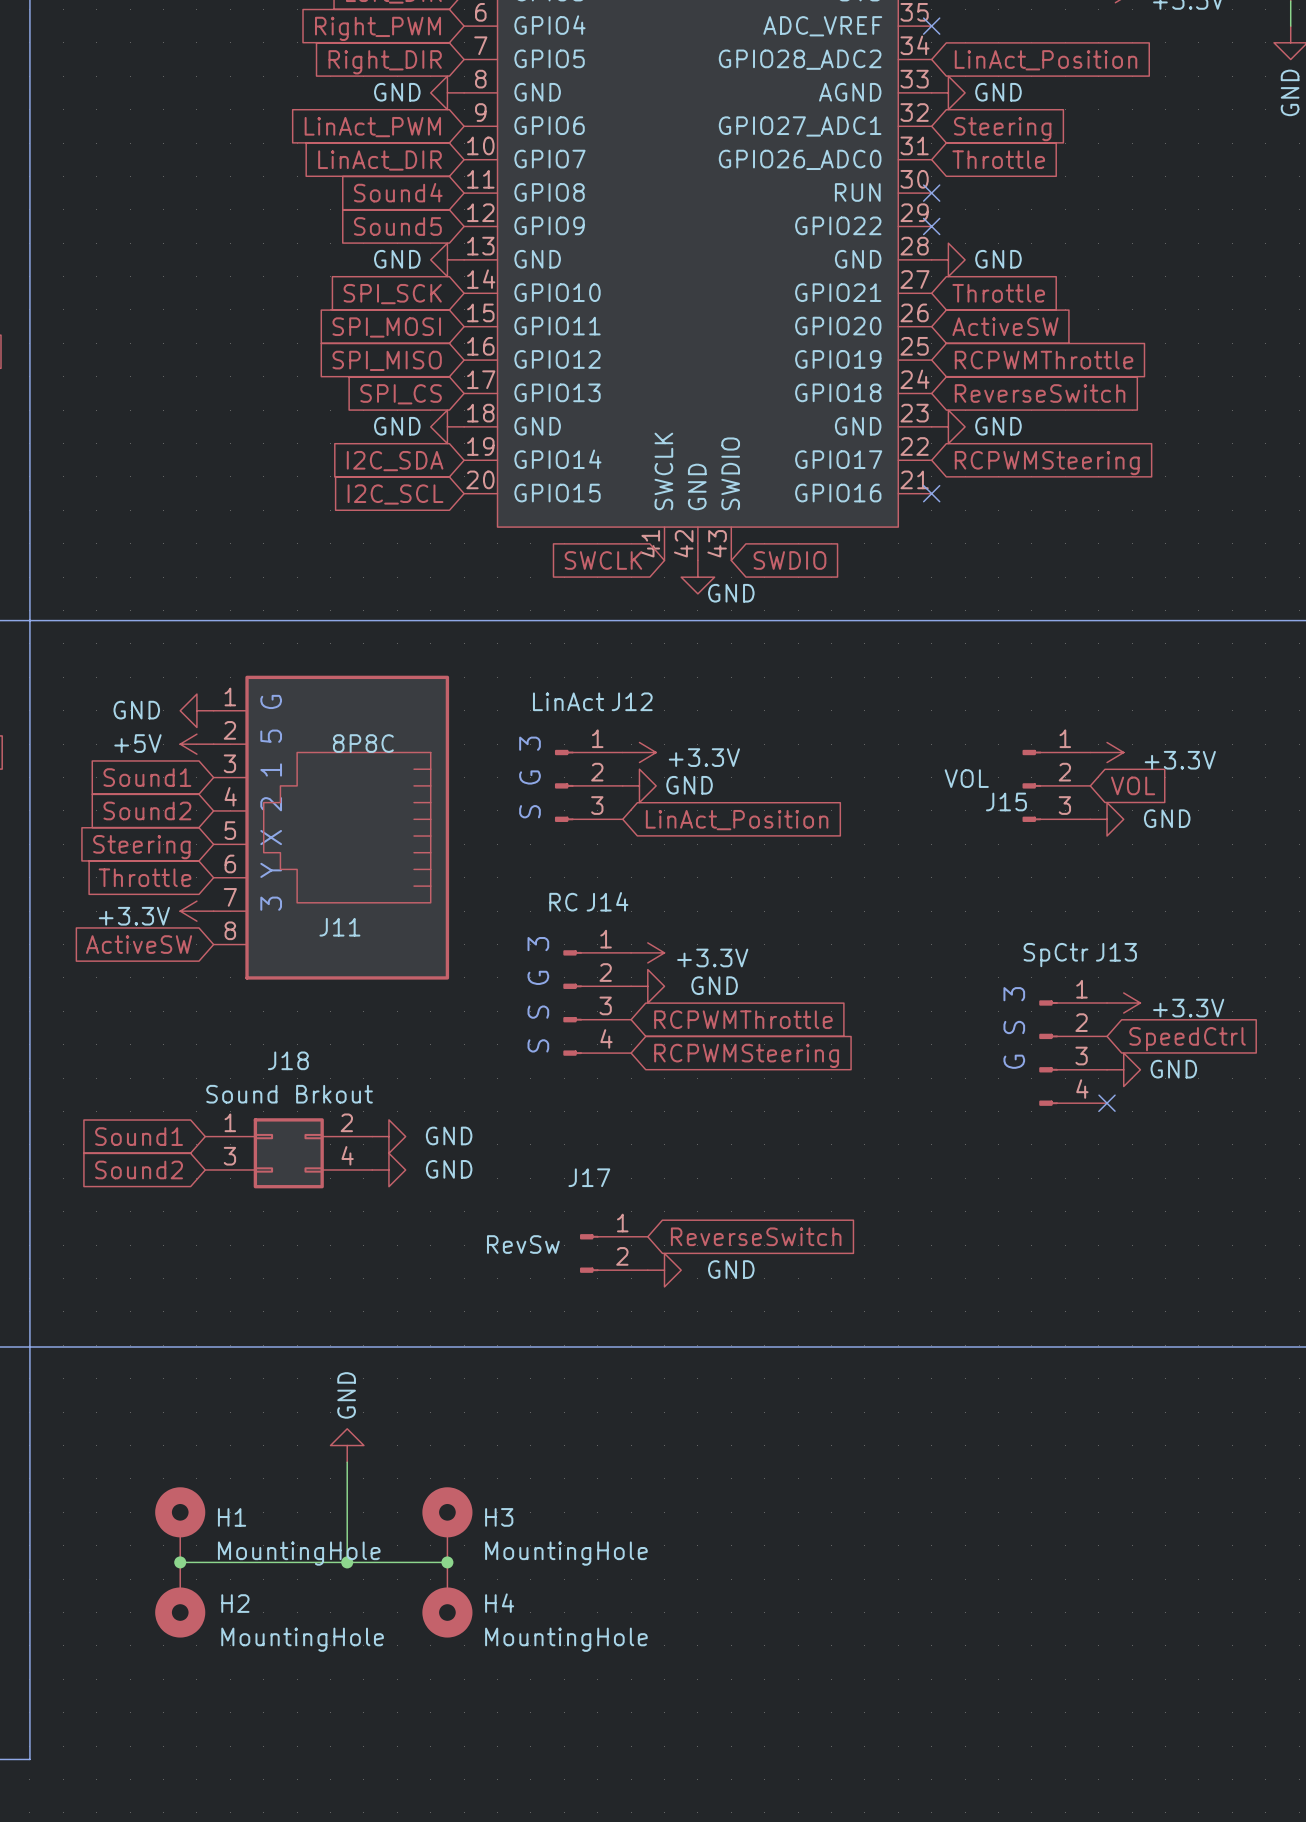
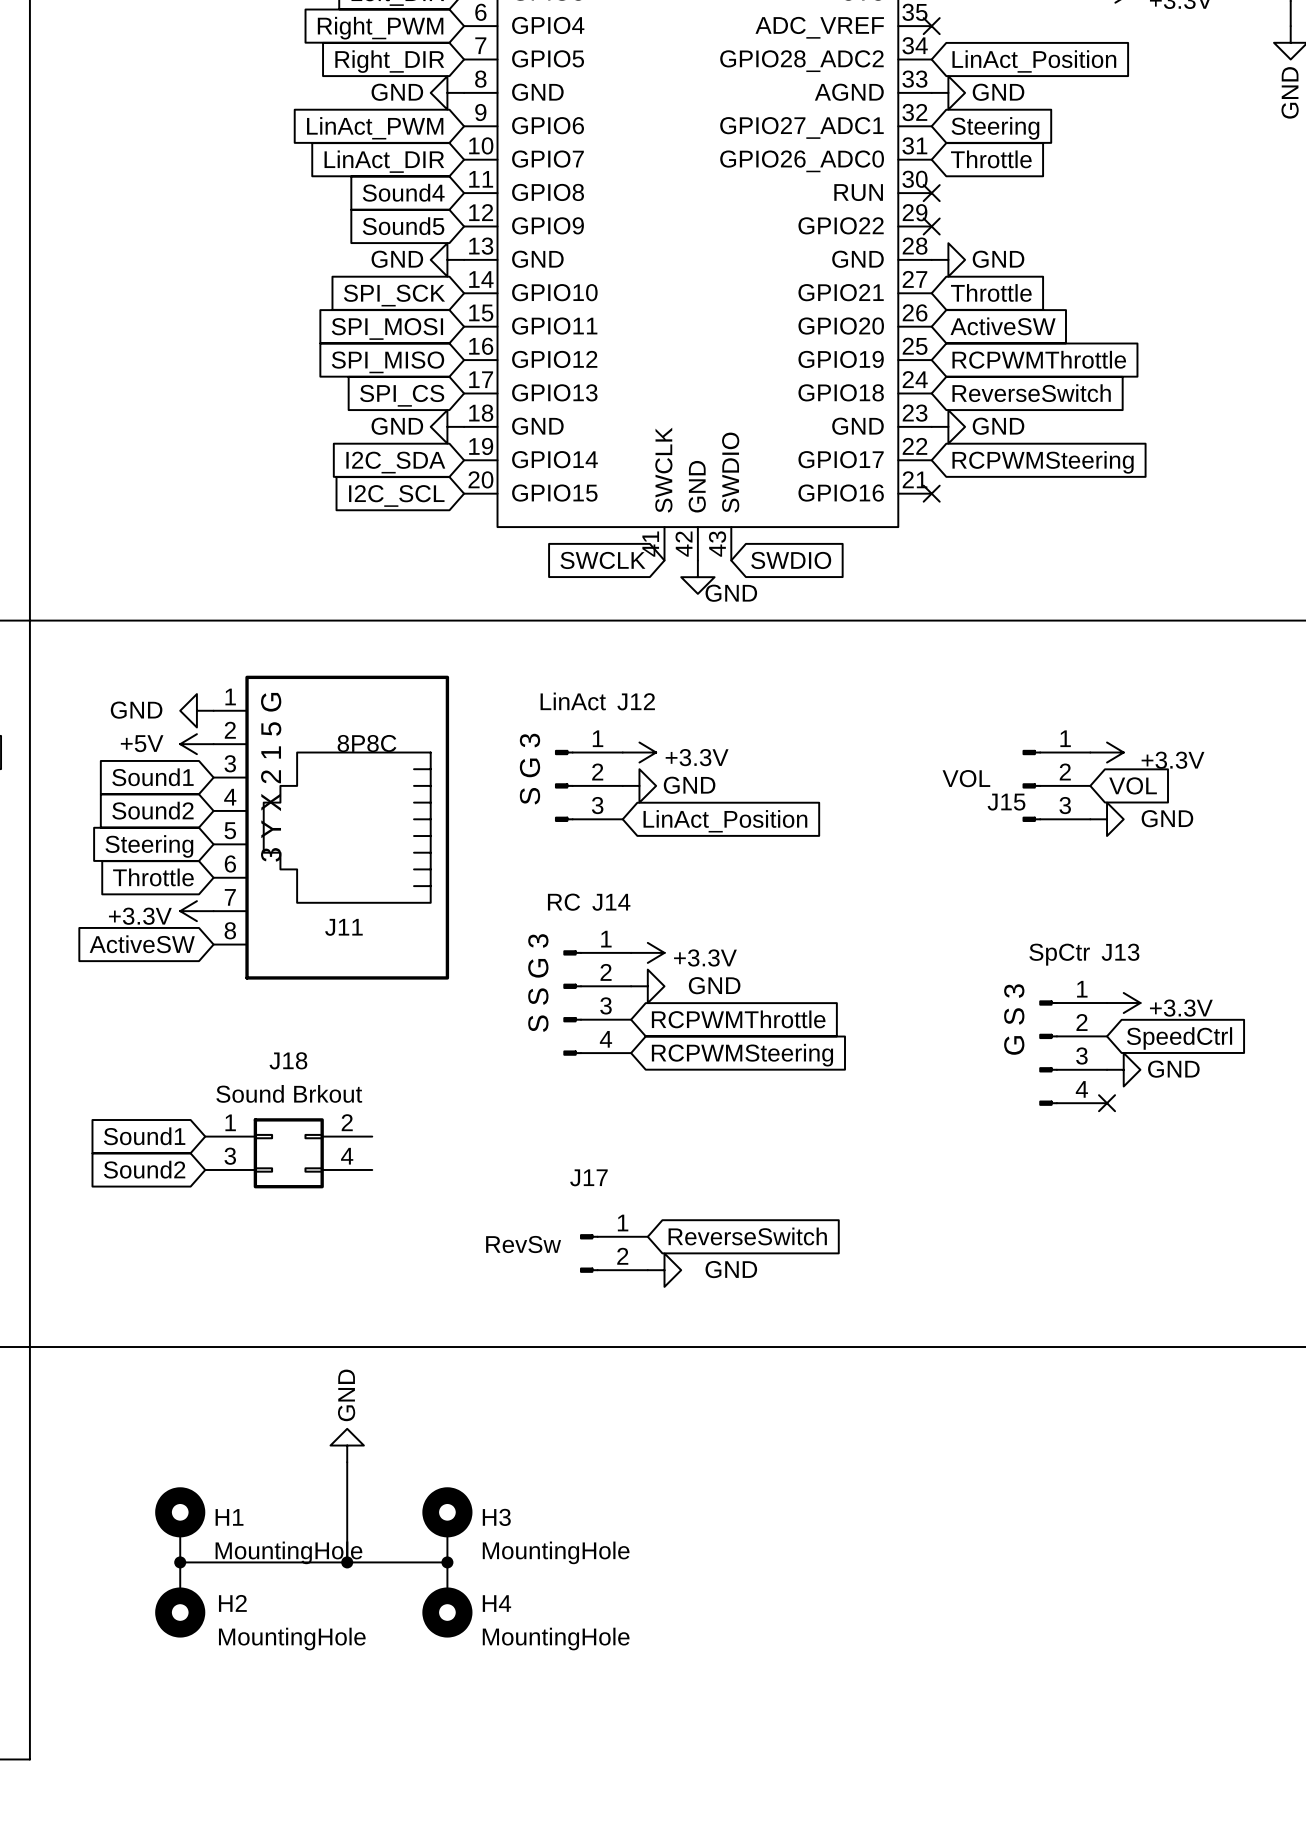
power symbol: GND (388, 1136) -> none
power symbol: GND (388, 1169) -> none

